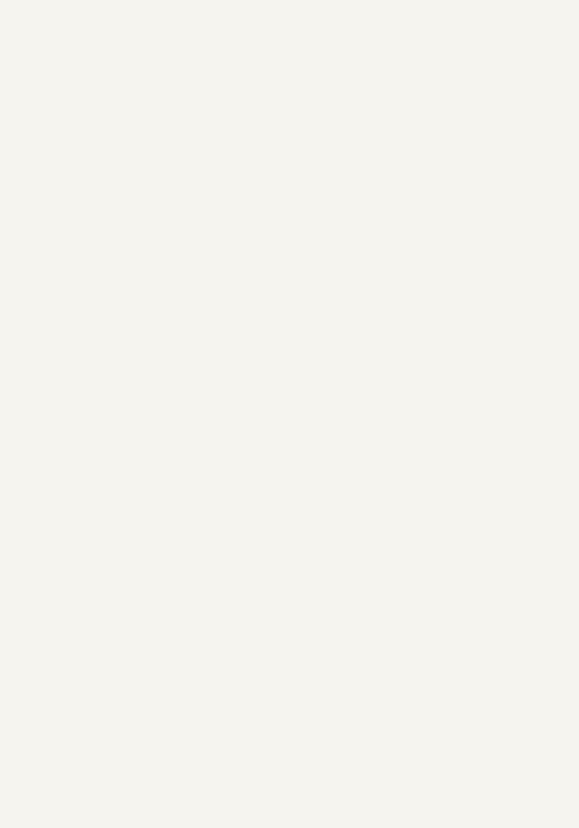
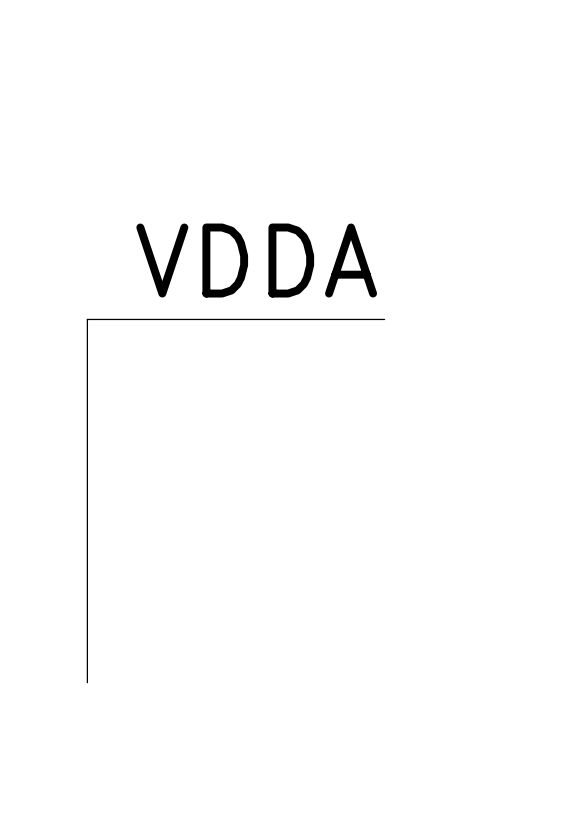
label: none -> VDDA (256, 260)
wire: none -> (384, 319) (87, 319) (87, 682)

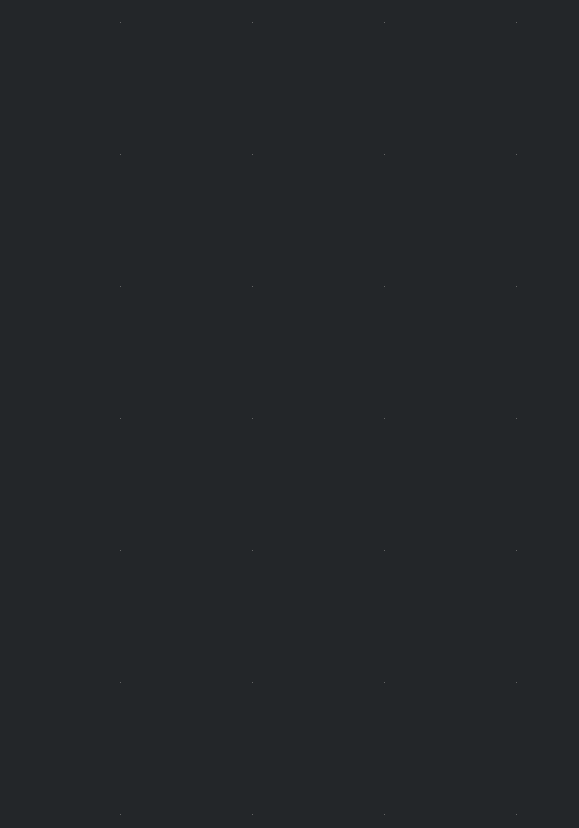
label: VDDA (256, 260) -> none
wire: (384, 319) (87, 319) (87, 682) -> none

